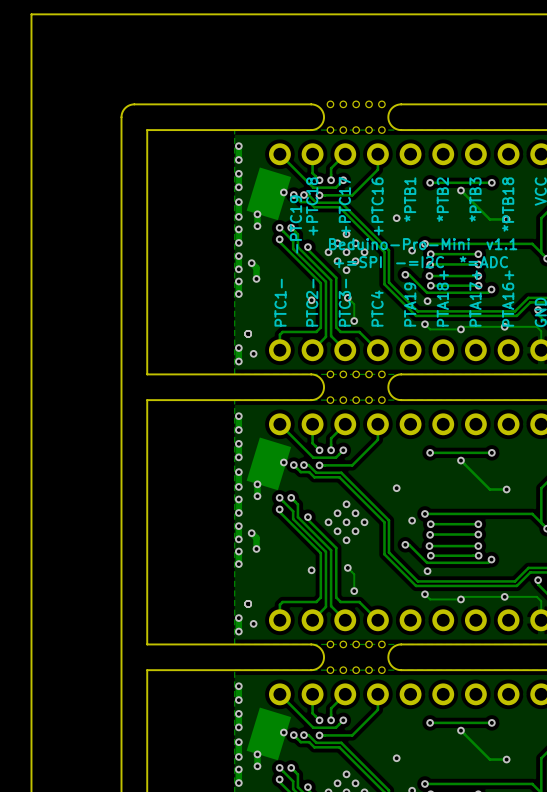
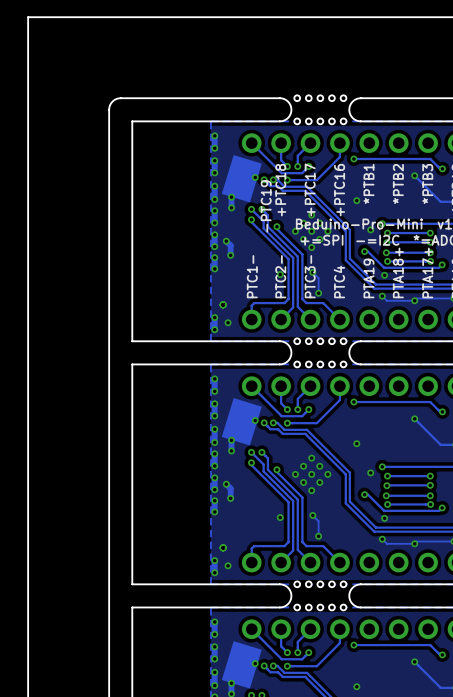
via position: (430, 182) -> (353, 158)
track: (489, 182) (430, 182) -> (440, 168) (430, 158) (353, 158)
via position: (430, 452) -> (353, 402)
track: (489, 452) (430, 452) -> (440, 411) (430, 402) (353, 402)
via position: (430, 722) -> (353, 645)
track: (489, 722) (430, 722) -> (440, 654) (430, 645) (353, 645)

